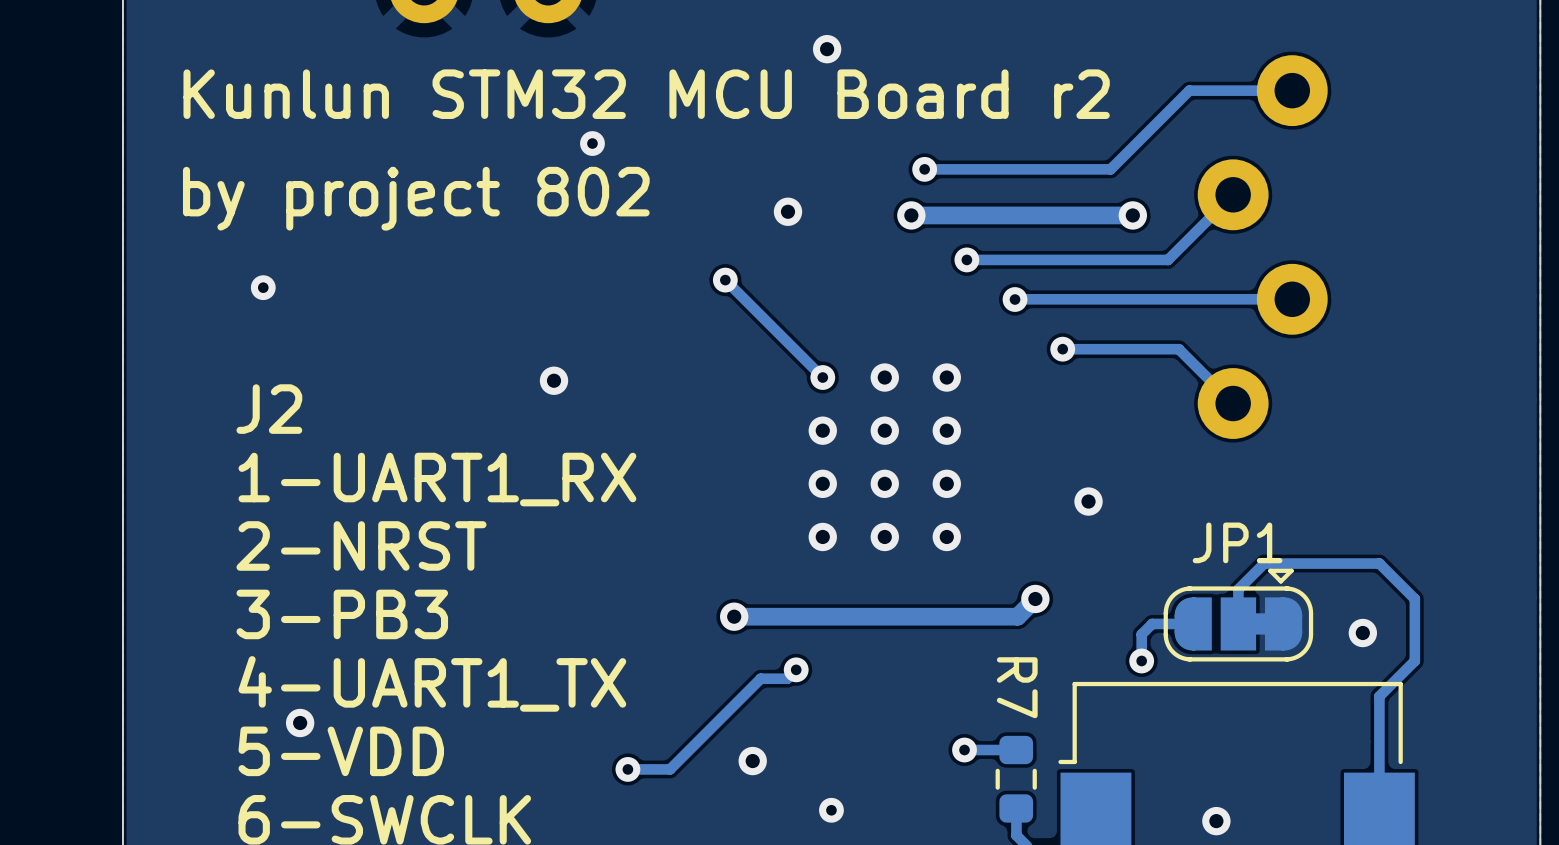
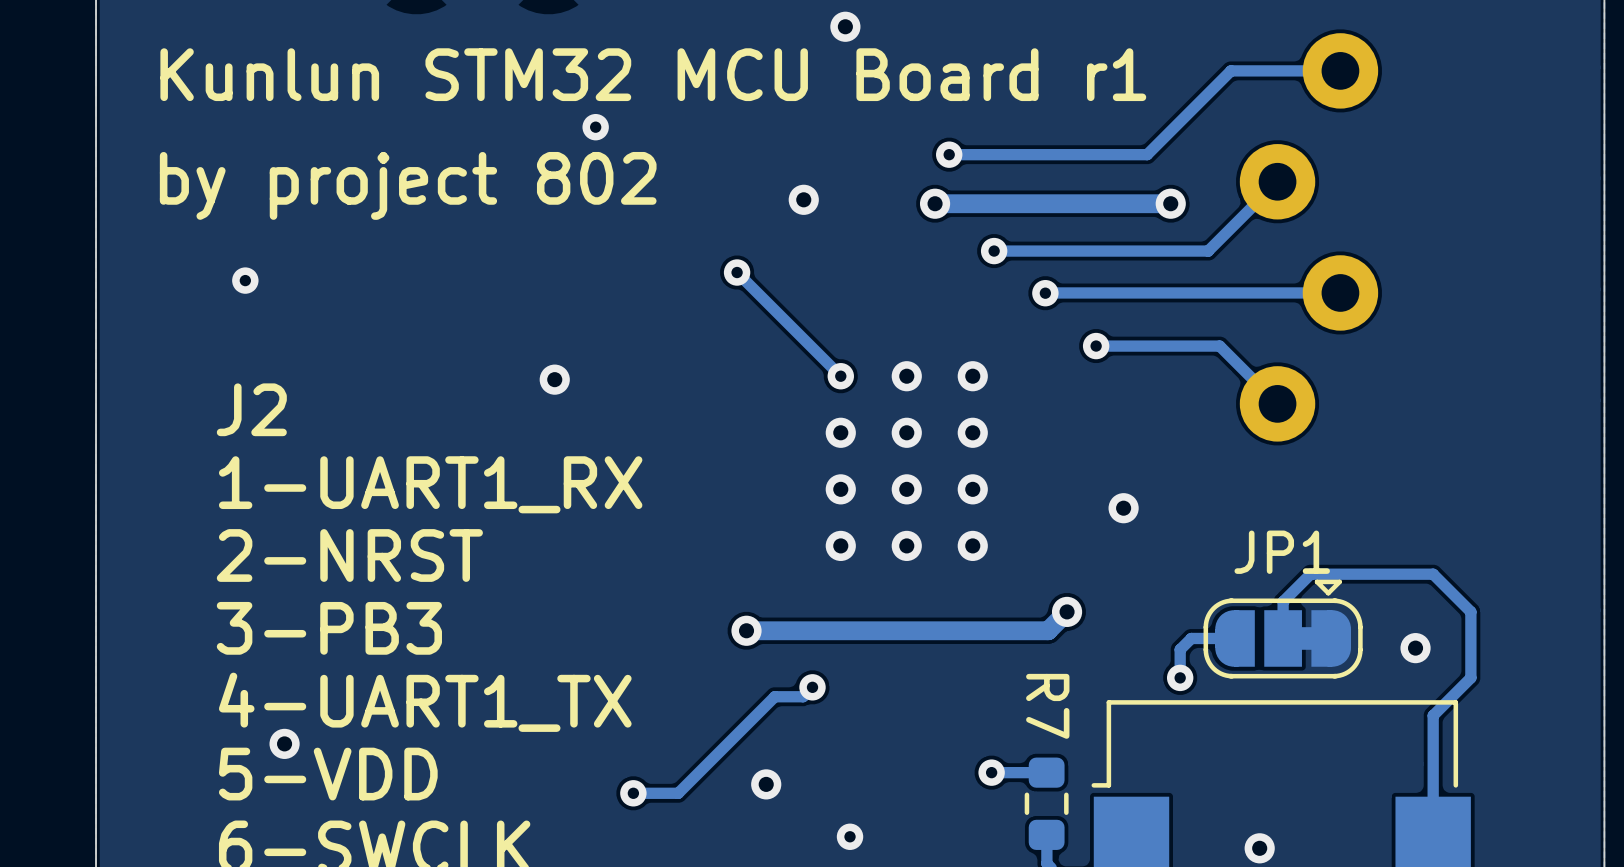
text: Kunlun STM32 MCU Board r2 (646, 94) -> Kunlun STM32 MCU Board r1 (653, 74)

